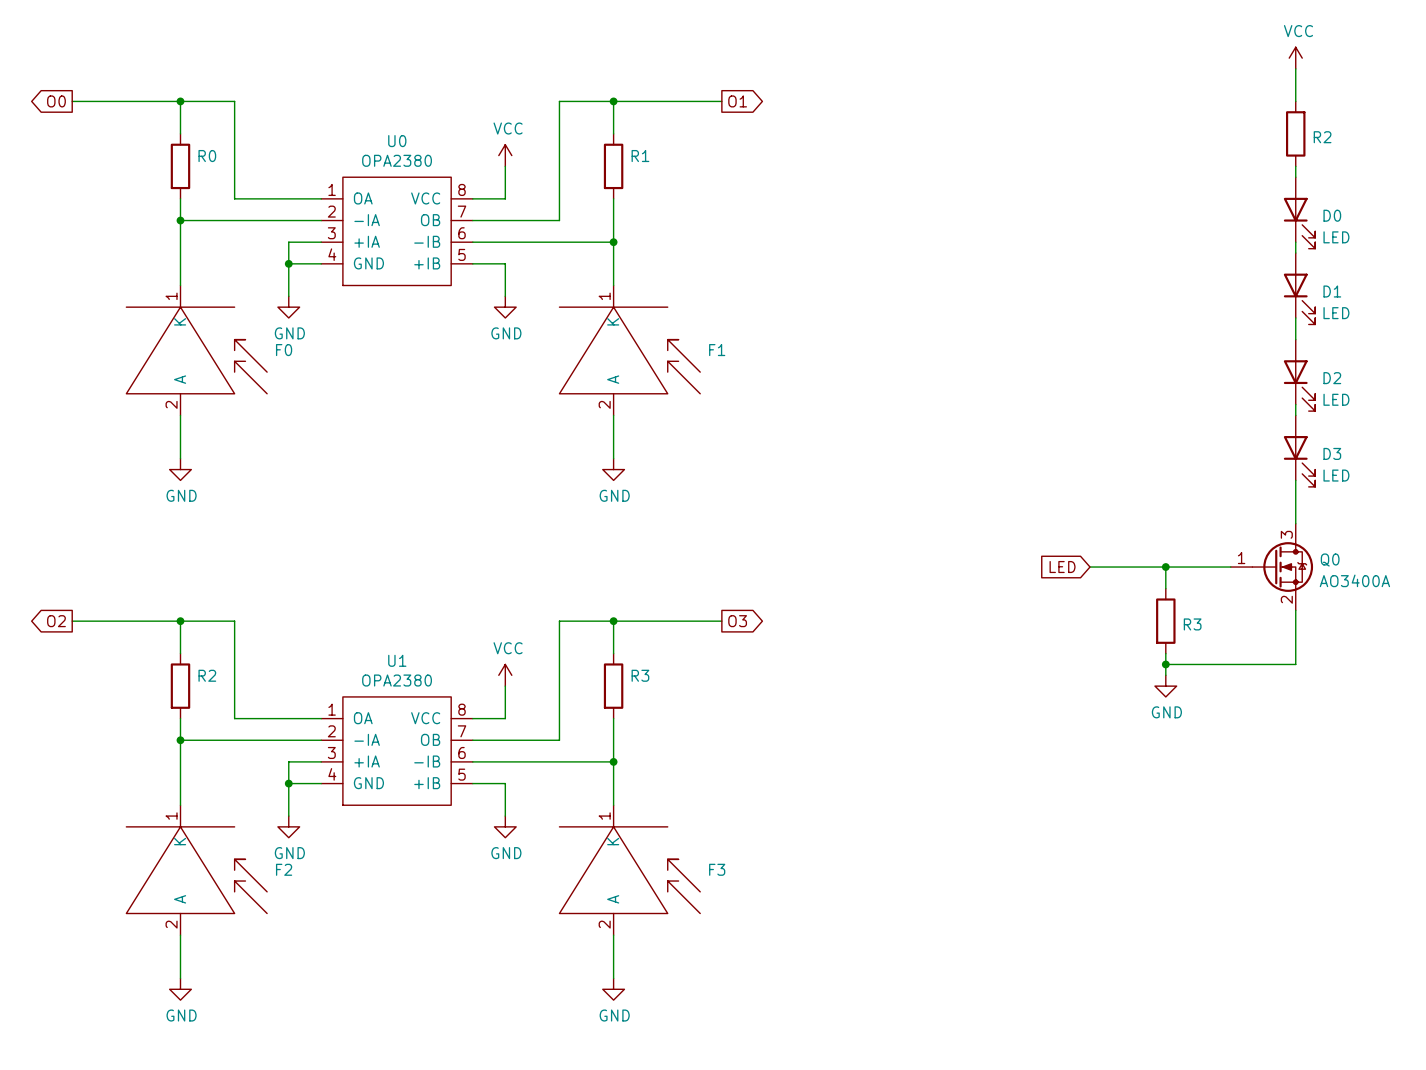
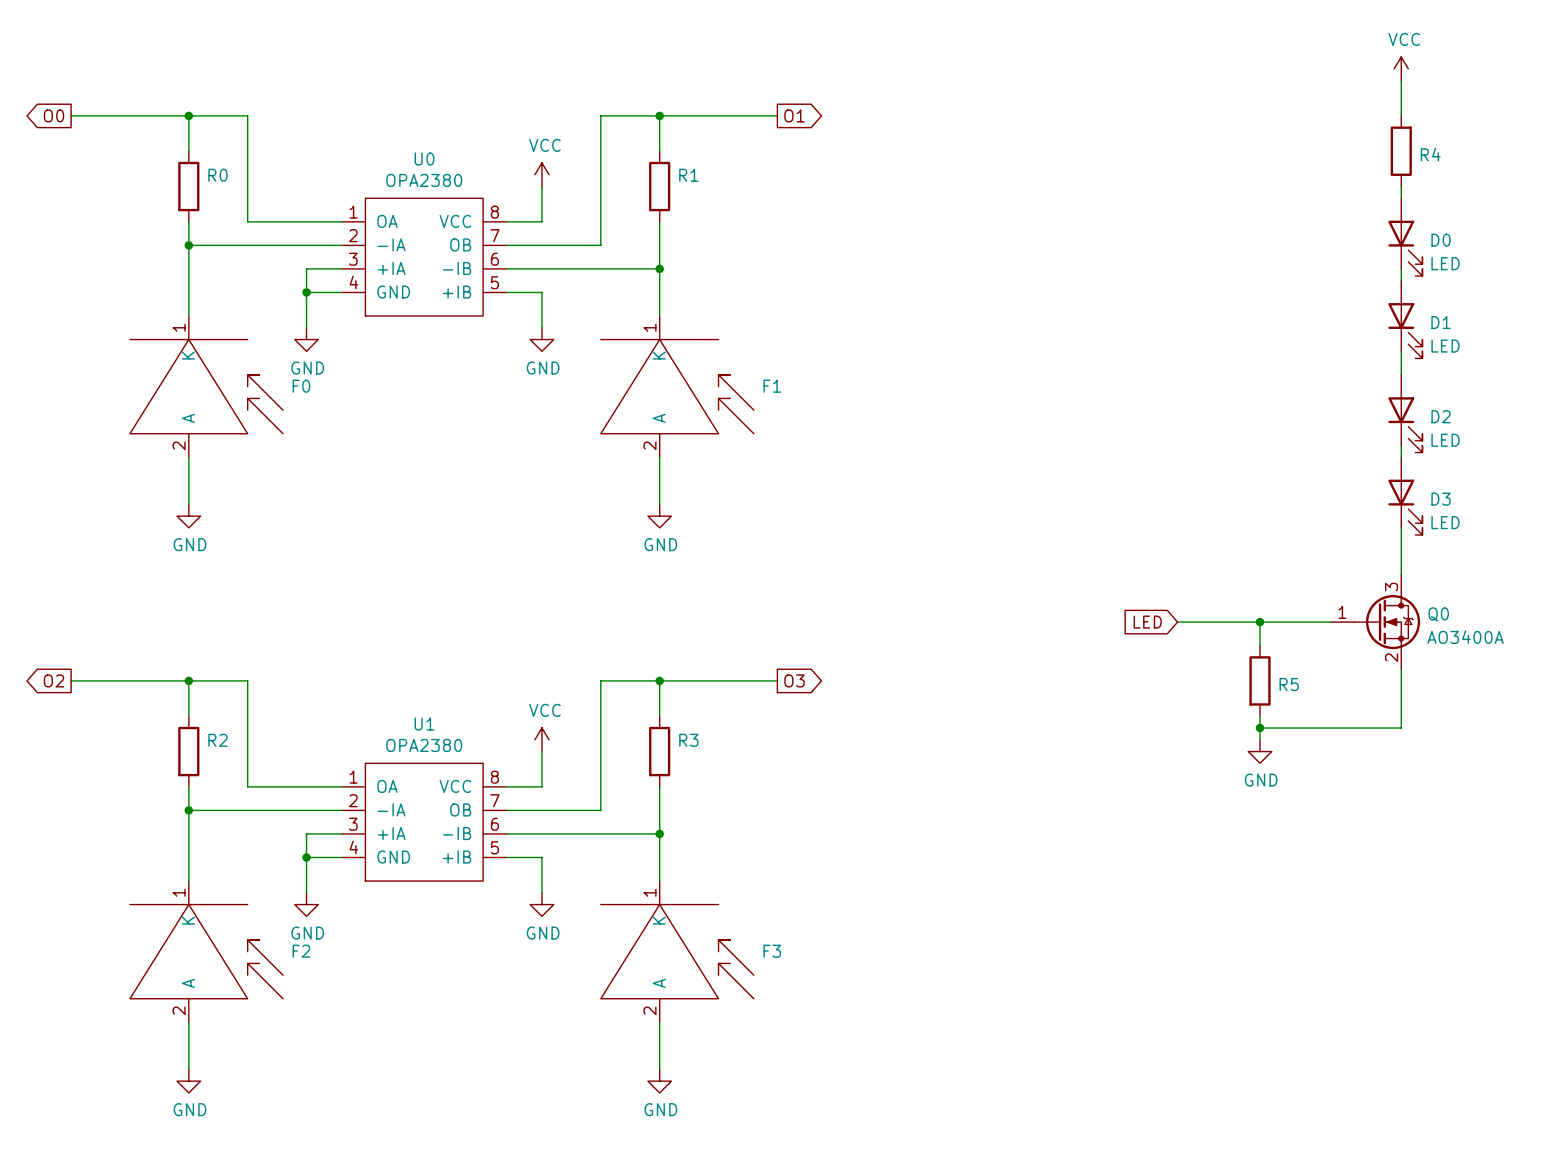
R2 name: R2 (1322, 137) -> R4 (1430, 154)
R3 name: R3 (1192, 624) -> R5 (1289, 684)

